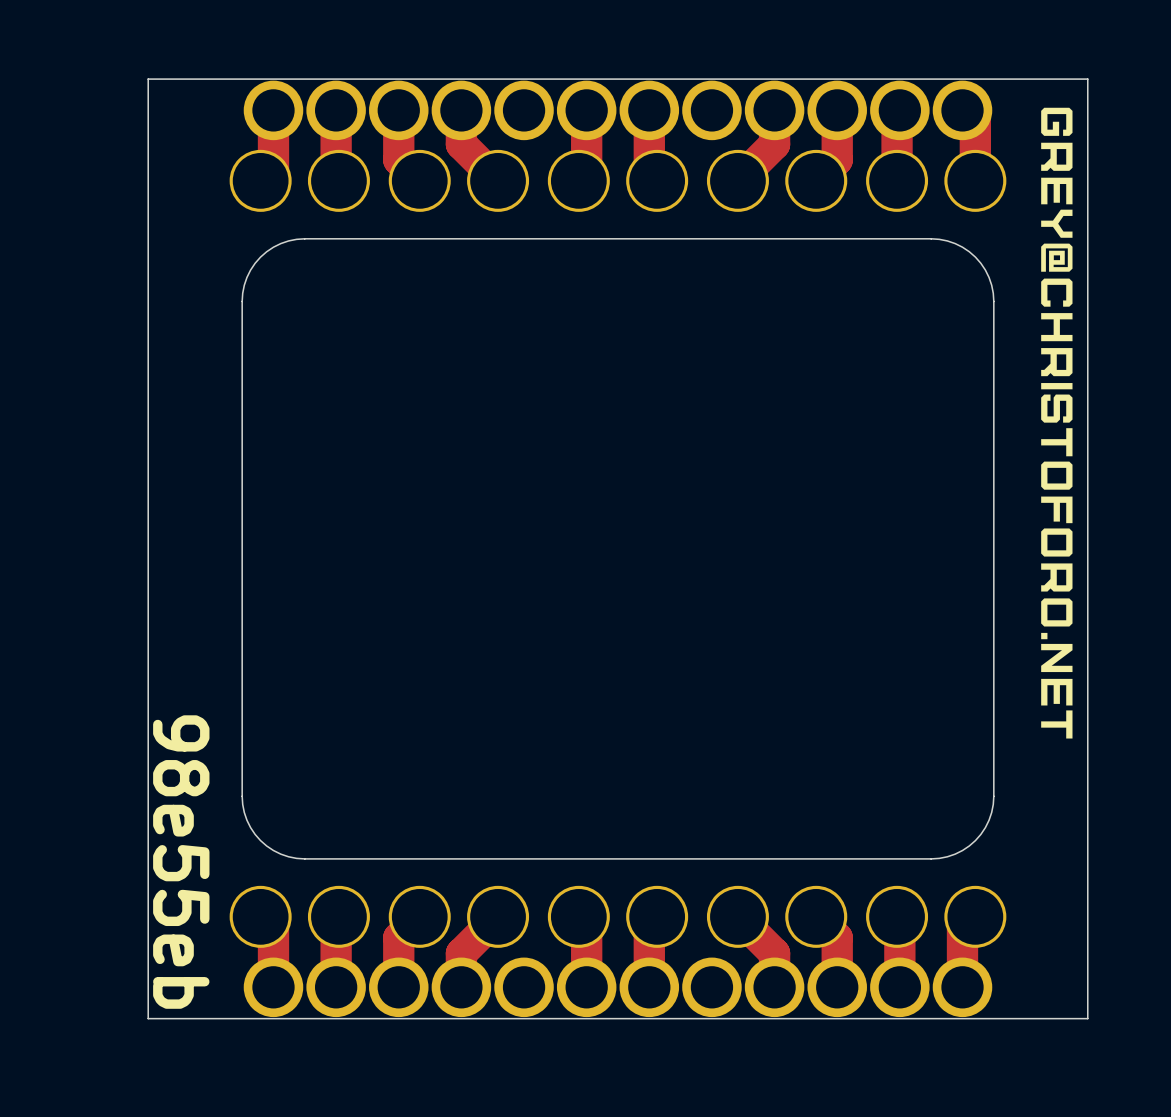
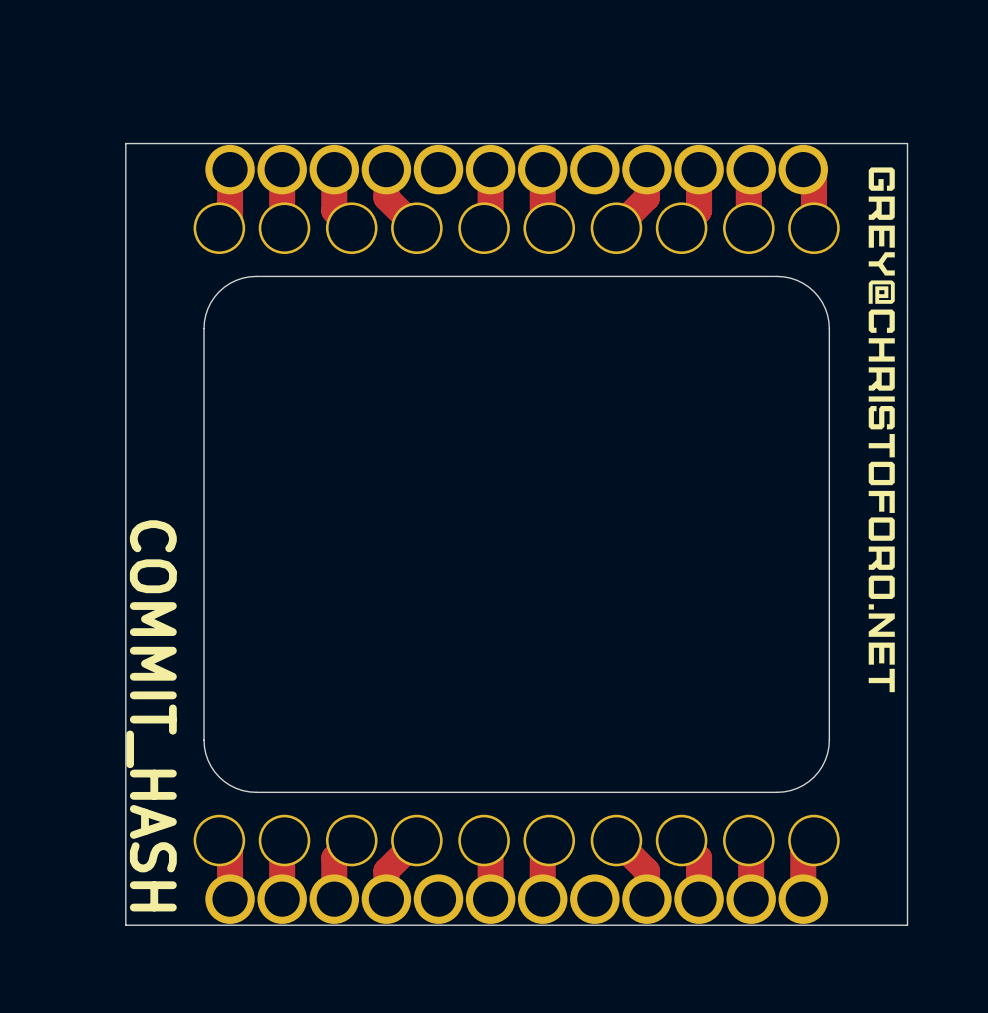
text: none -> COMMIT_HASH (151, 715)
text: 98e55eb (181, 862) -> none

